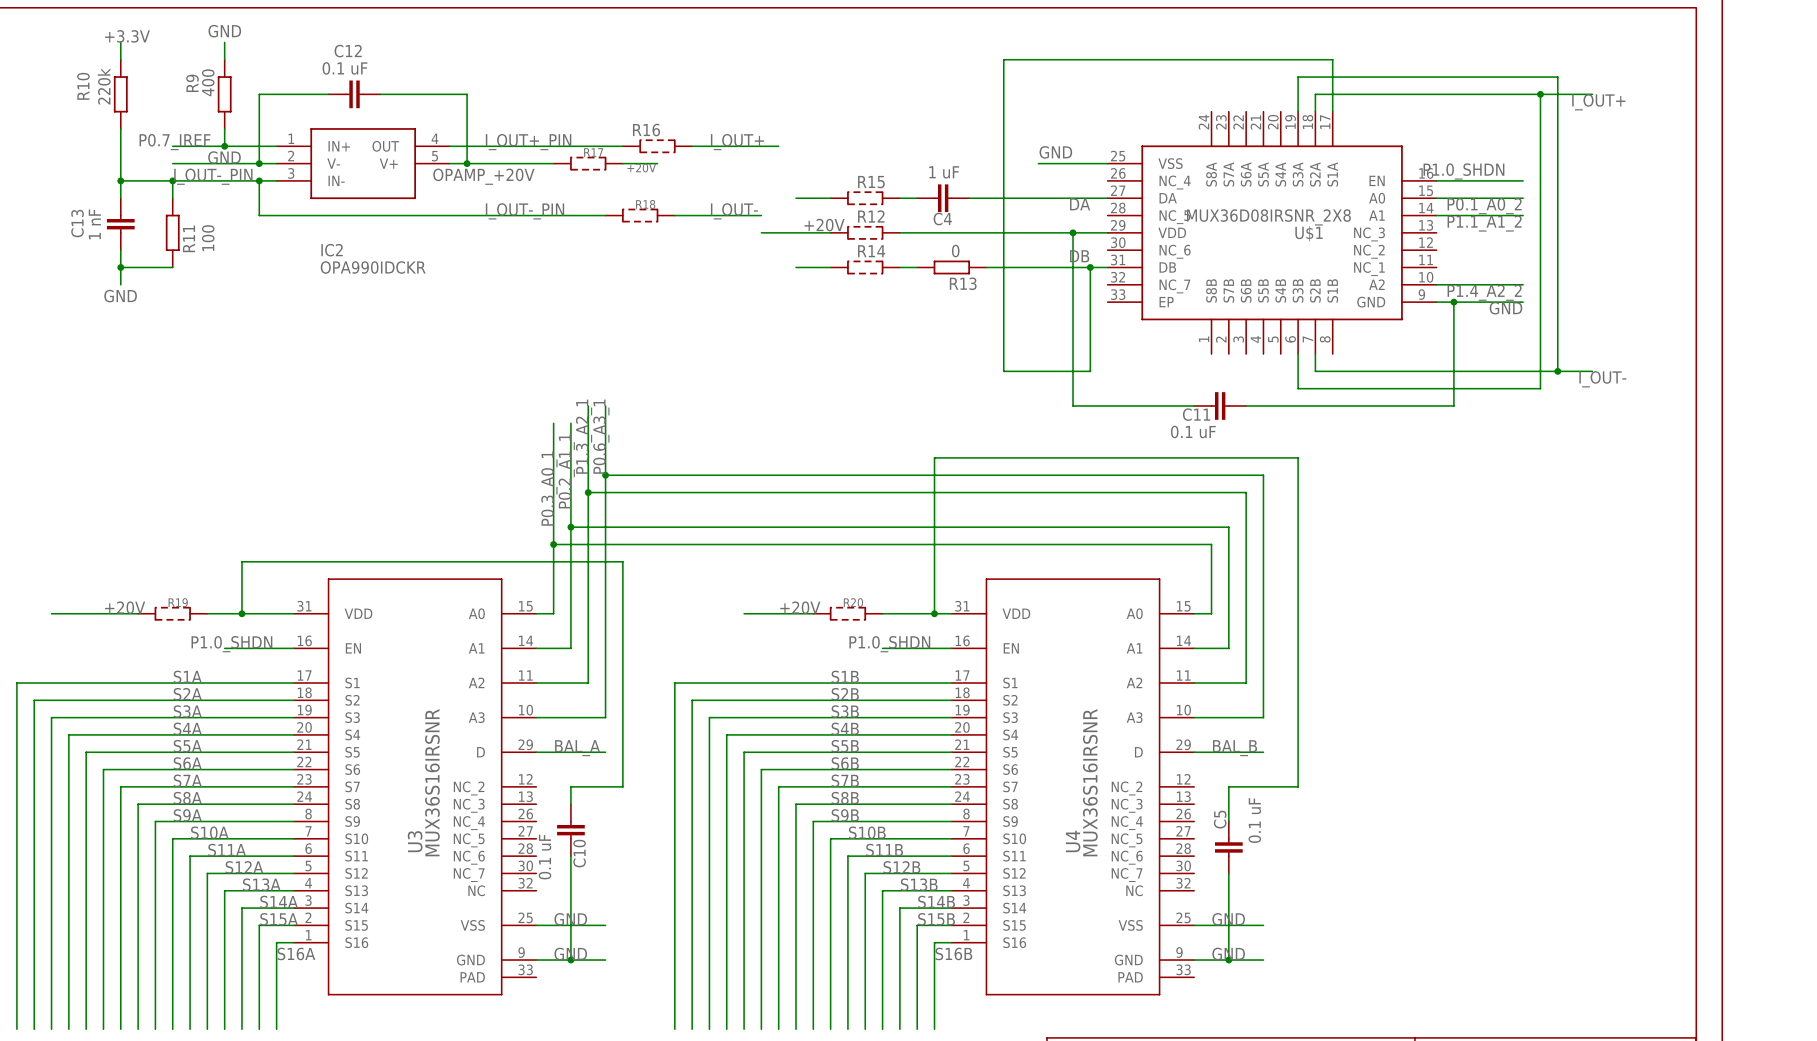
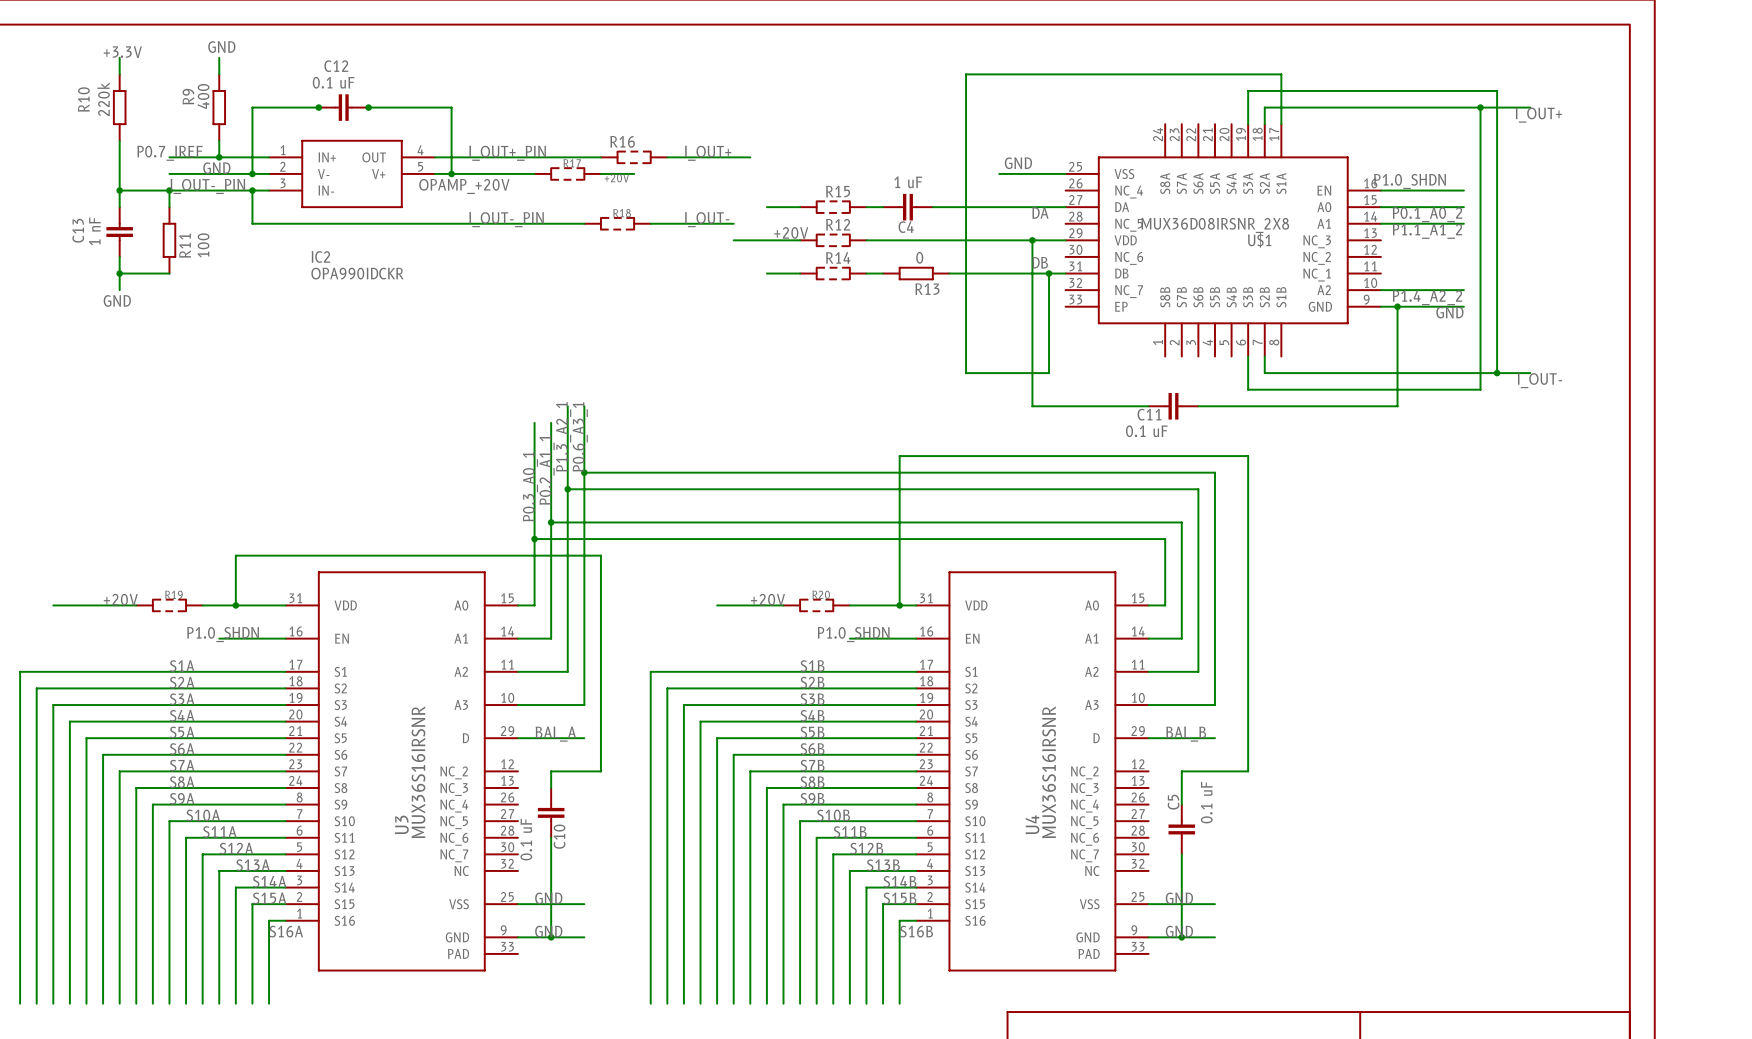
junction: none -> (318, 107)
junction: none -> (368, 107)

